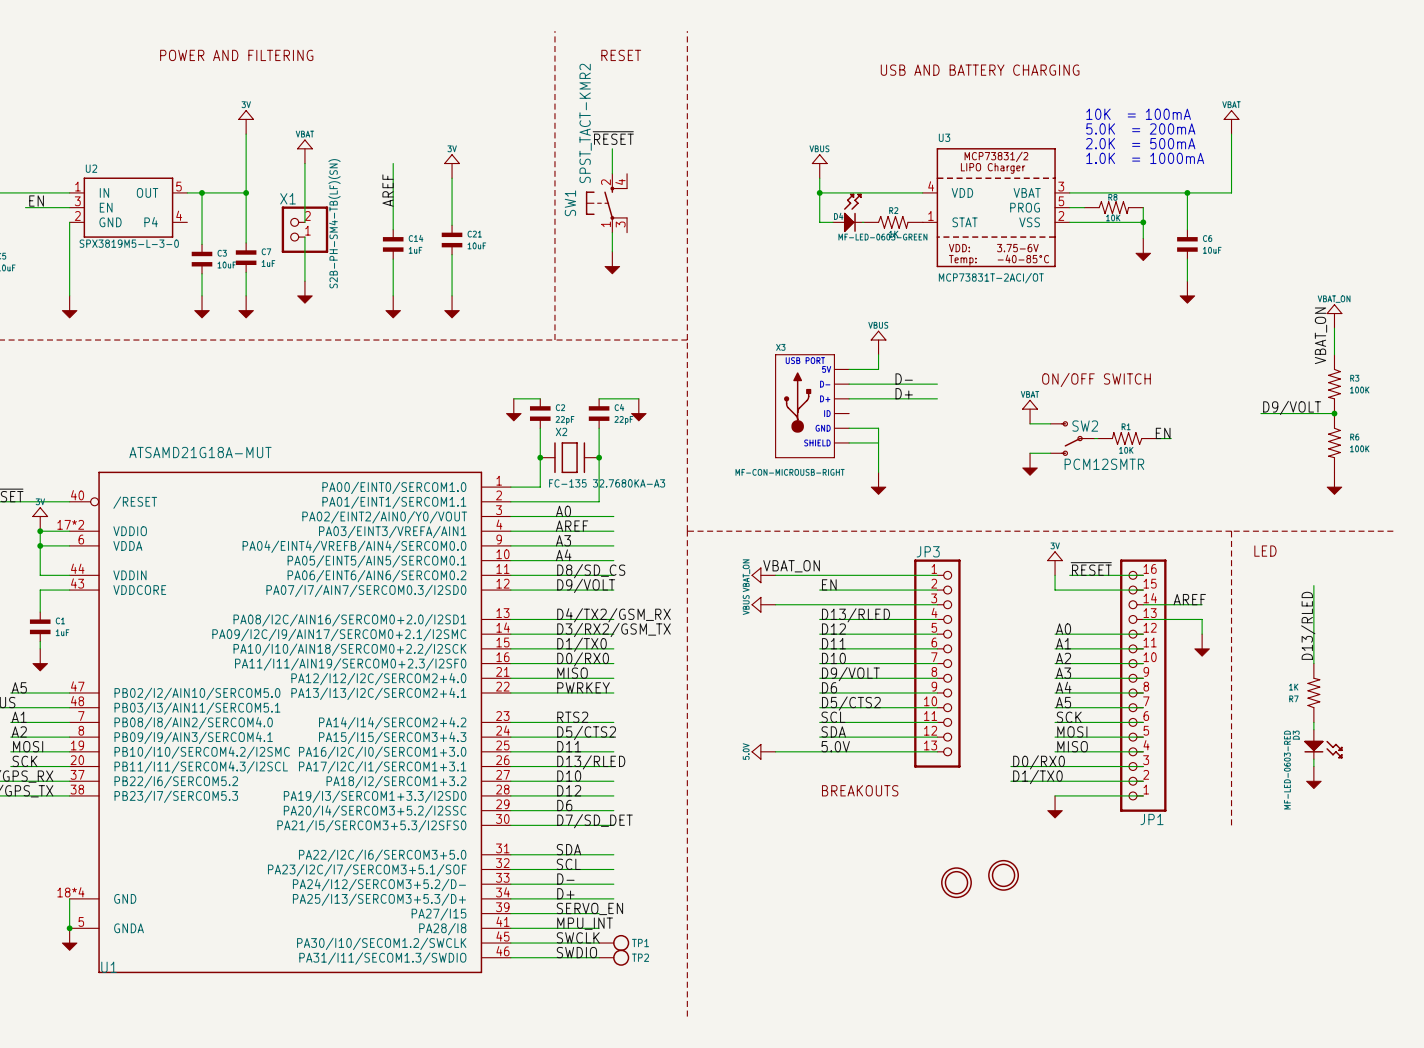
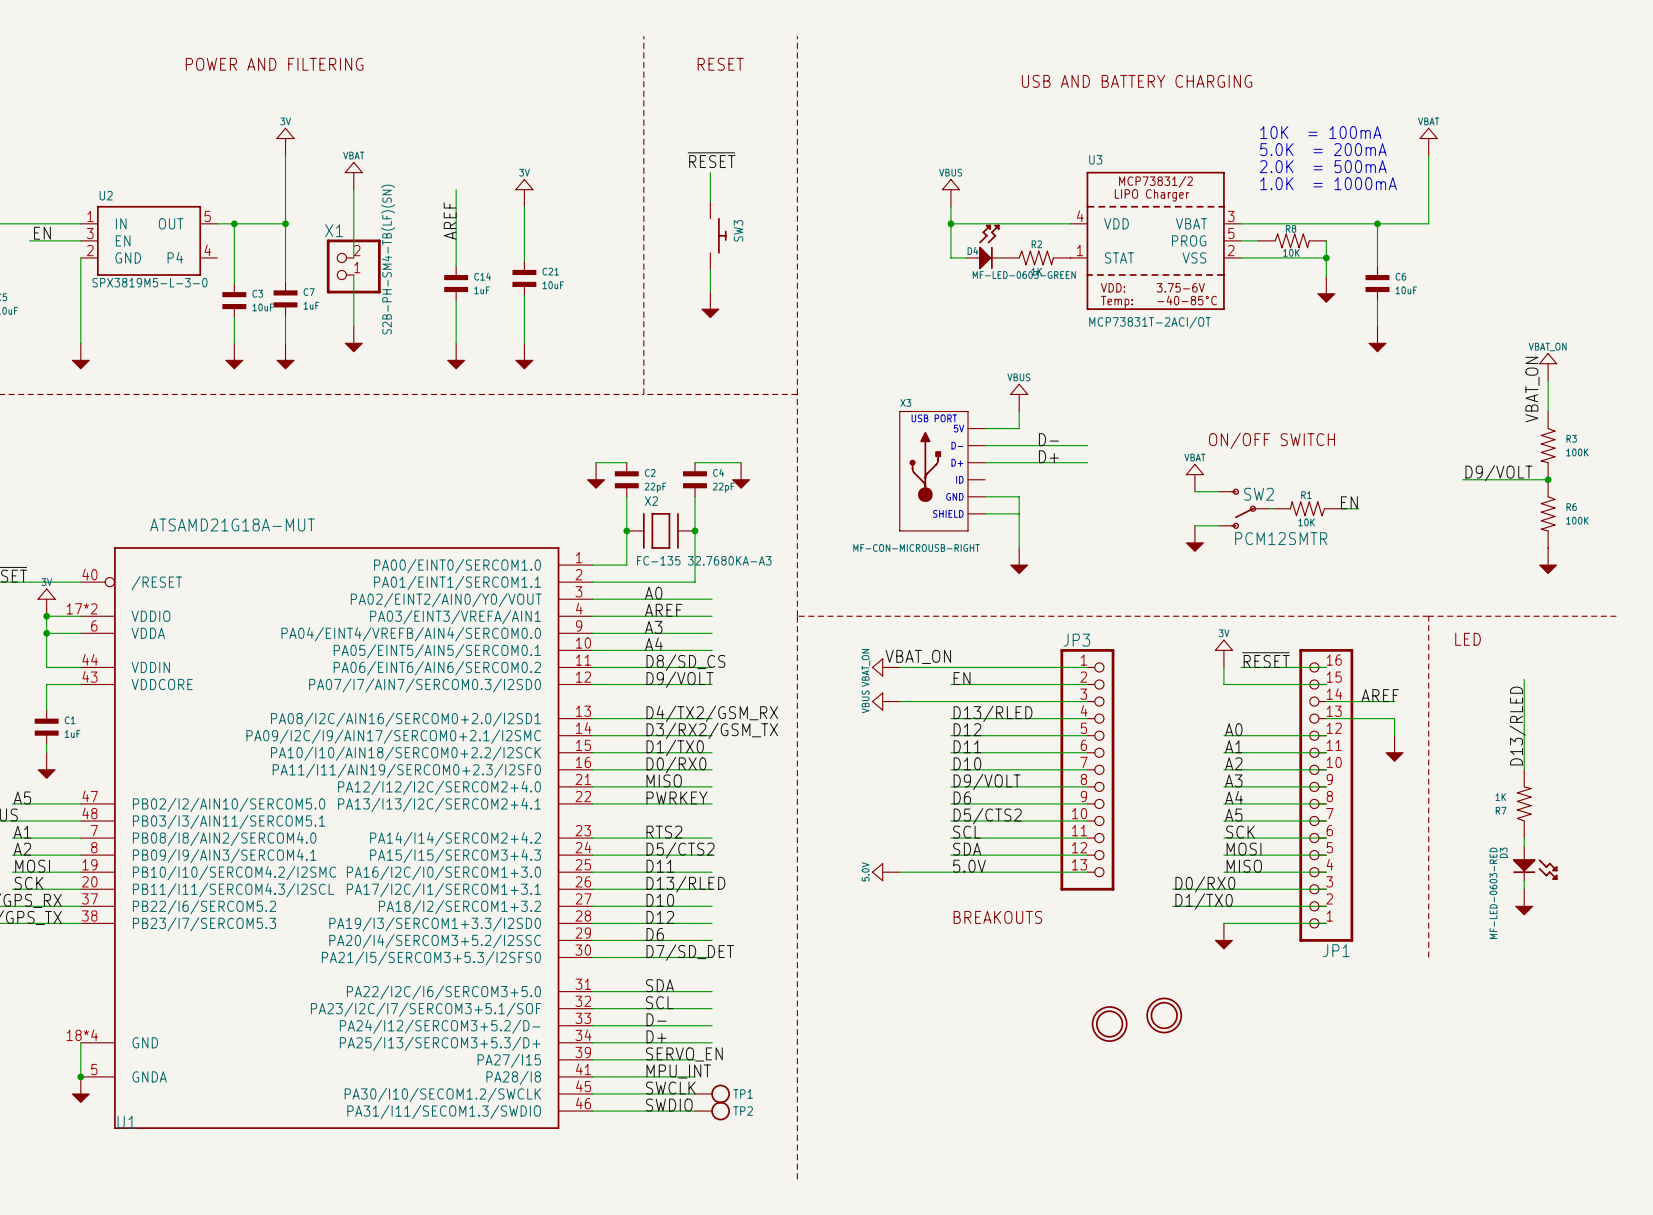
SW1: SPST_TACT-KMR2 (606, 203) -> none
SW3: none -> (718, 235)

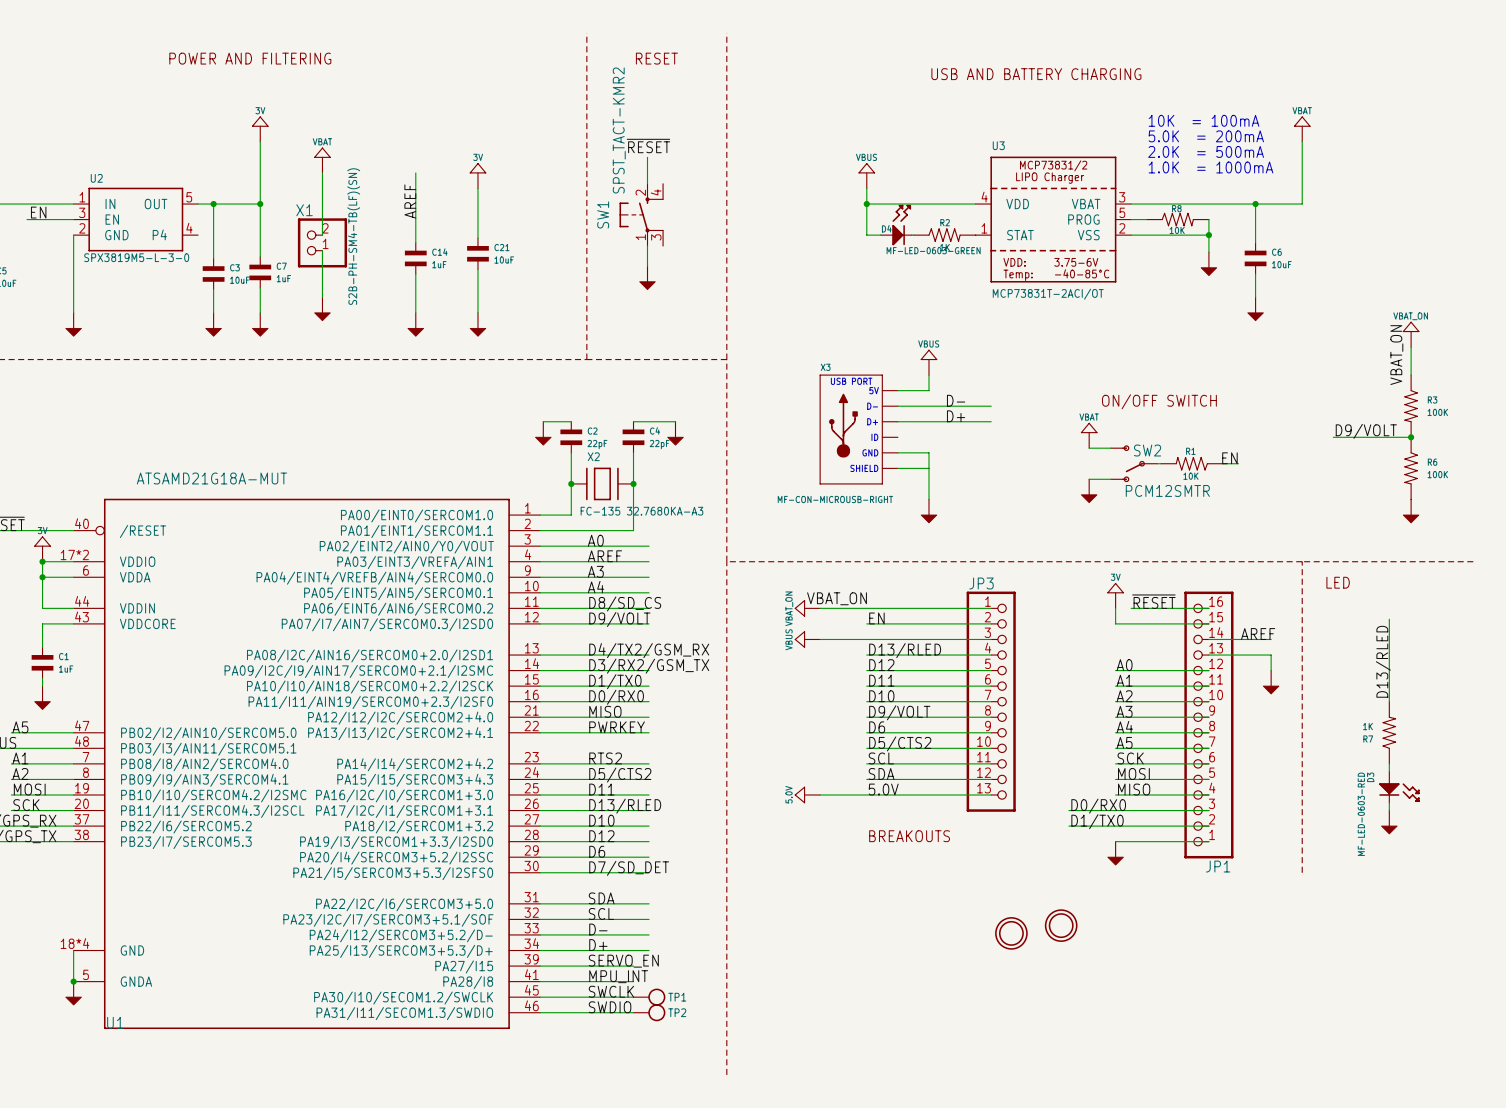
SW1: none -> SPST_TACT-KMR2 (641, 214)
SW3: (718, 235) -> none

